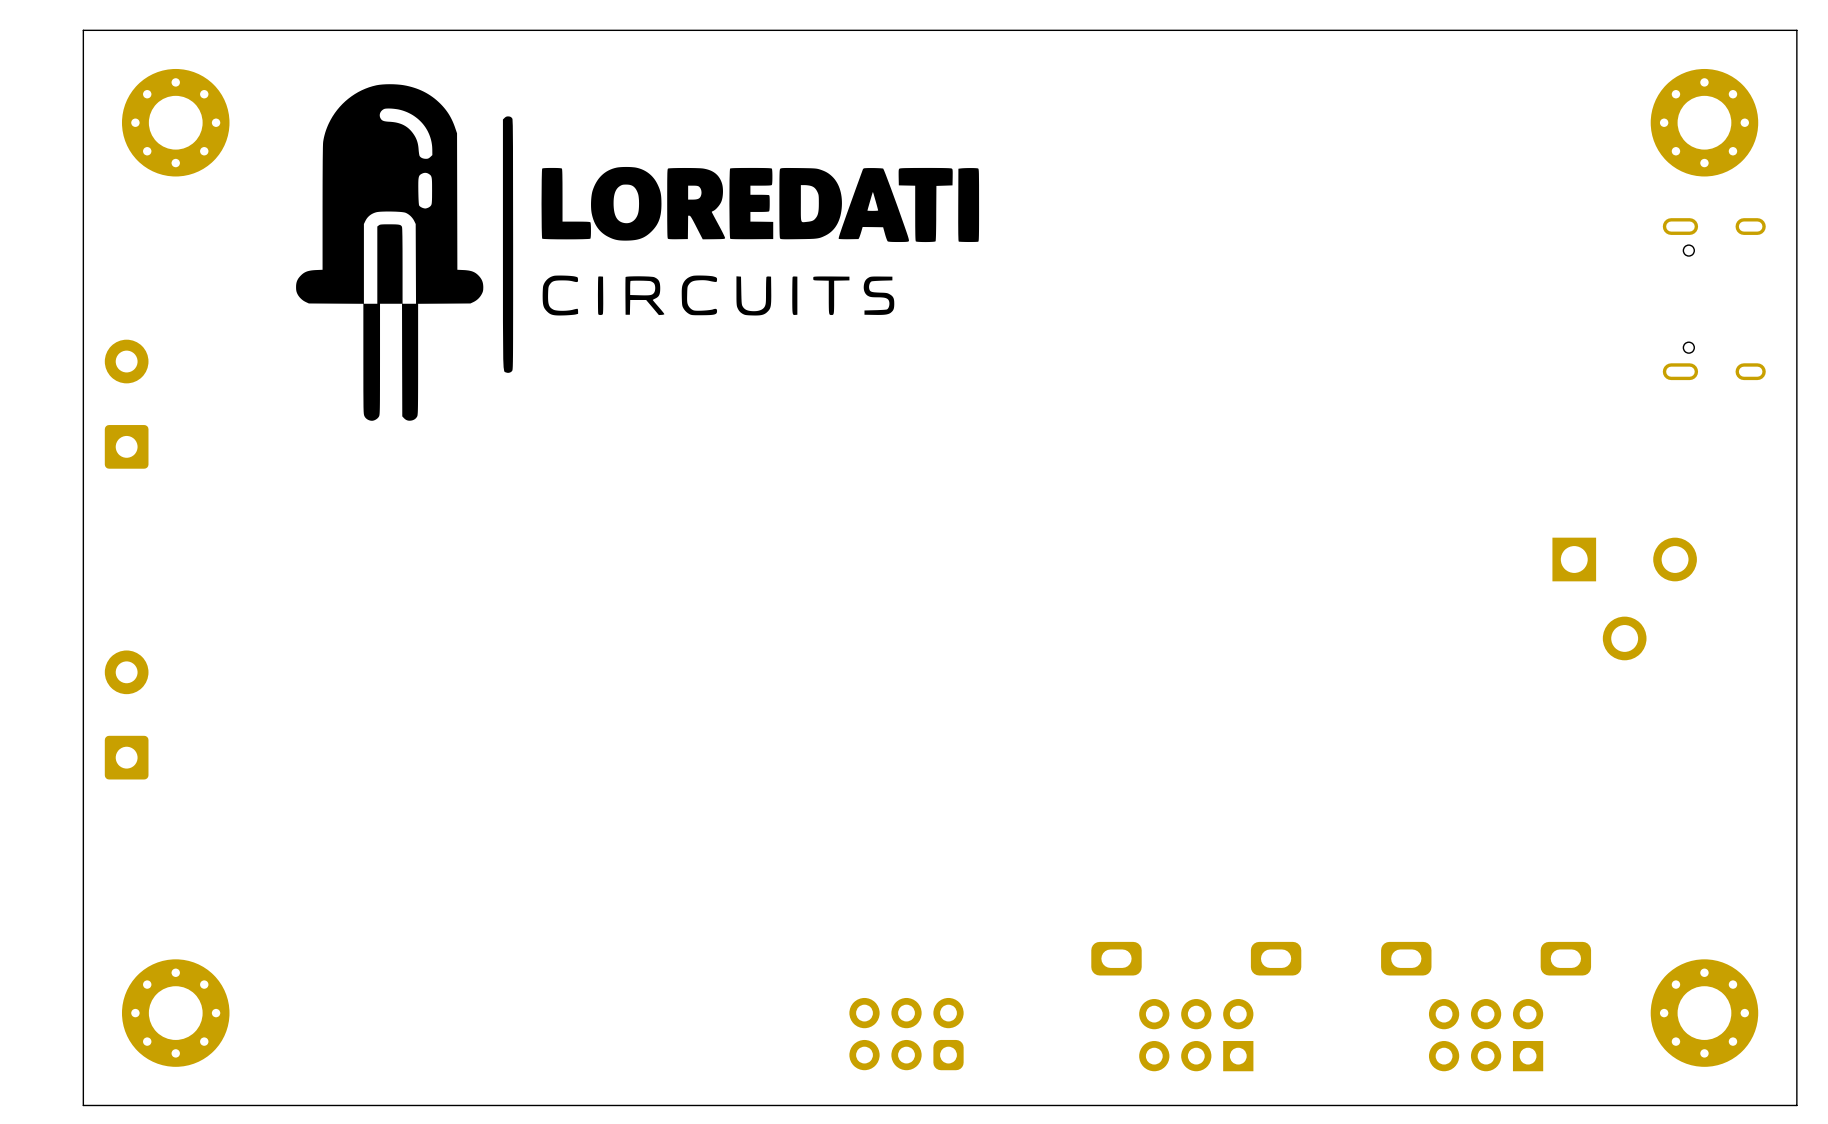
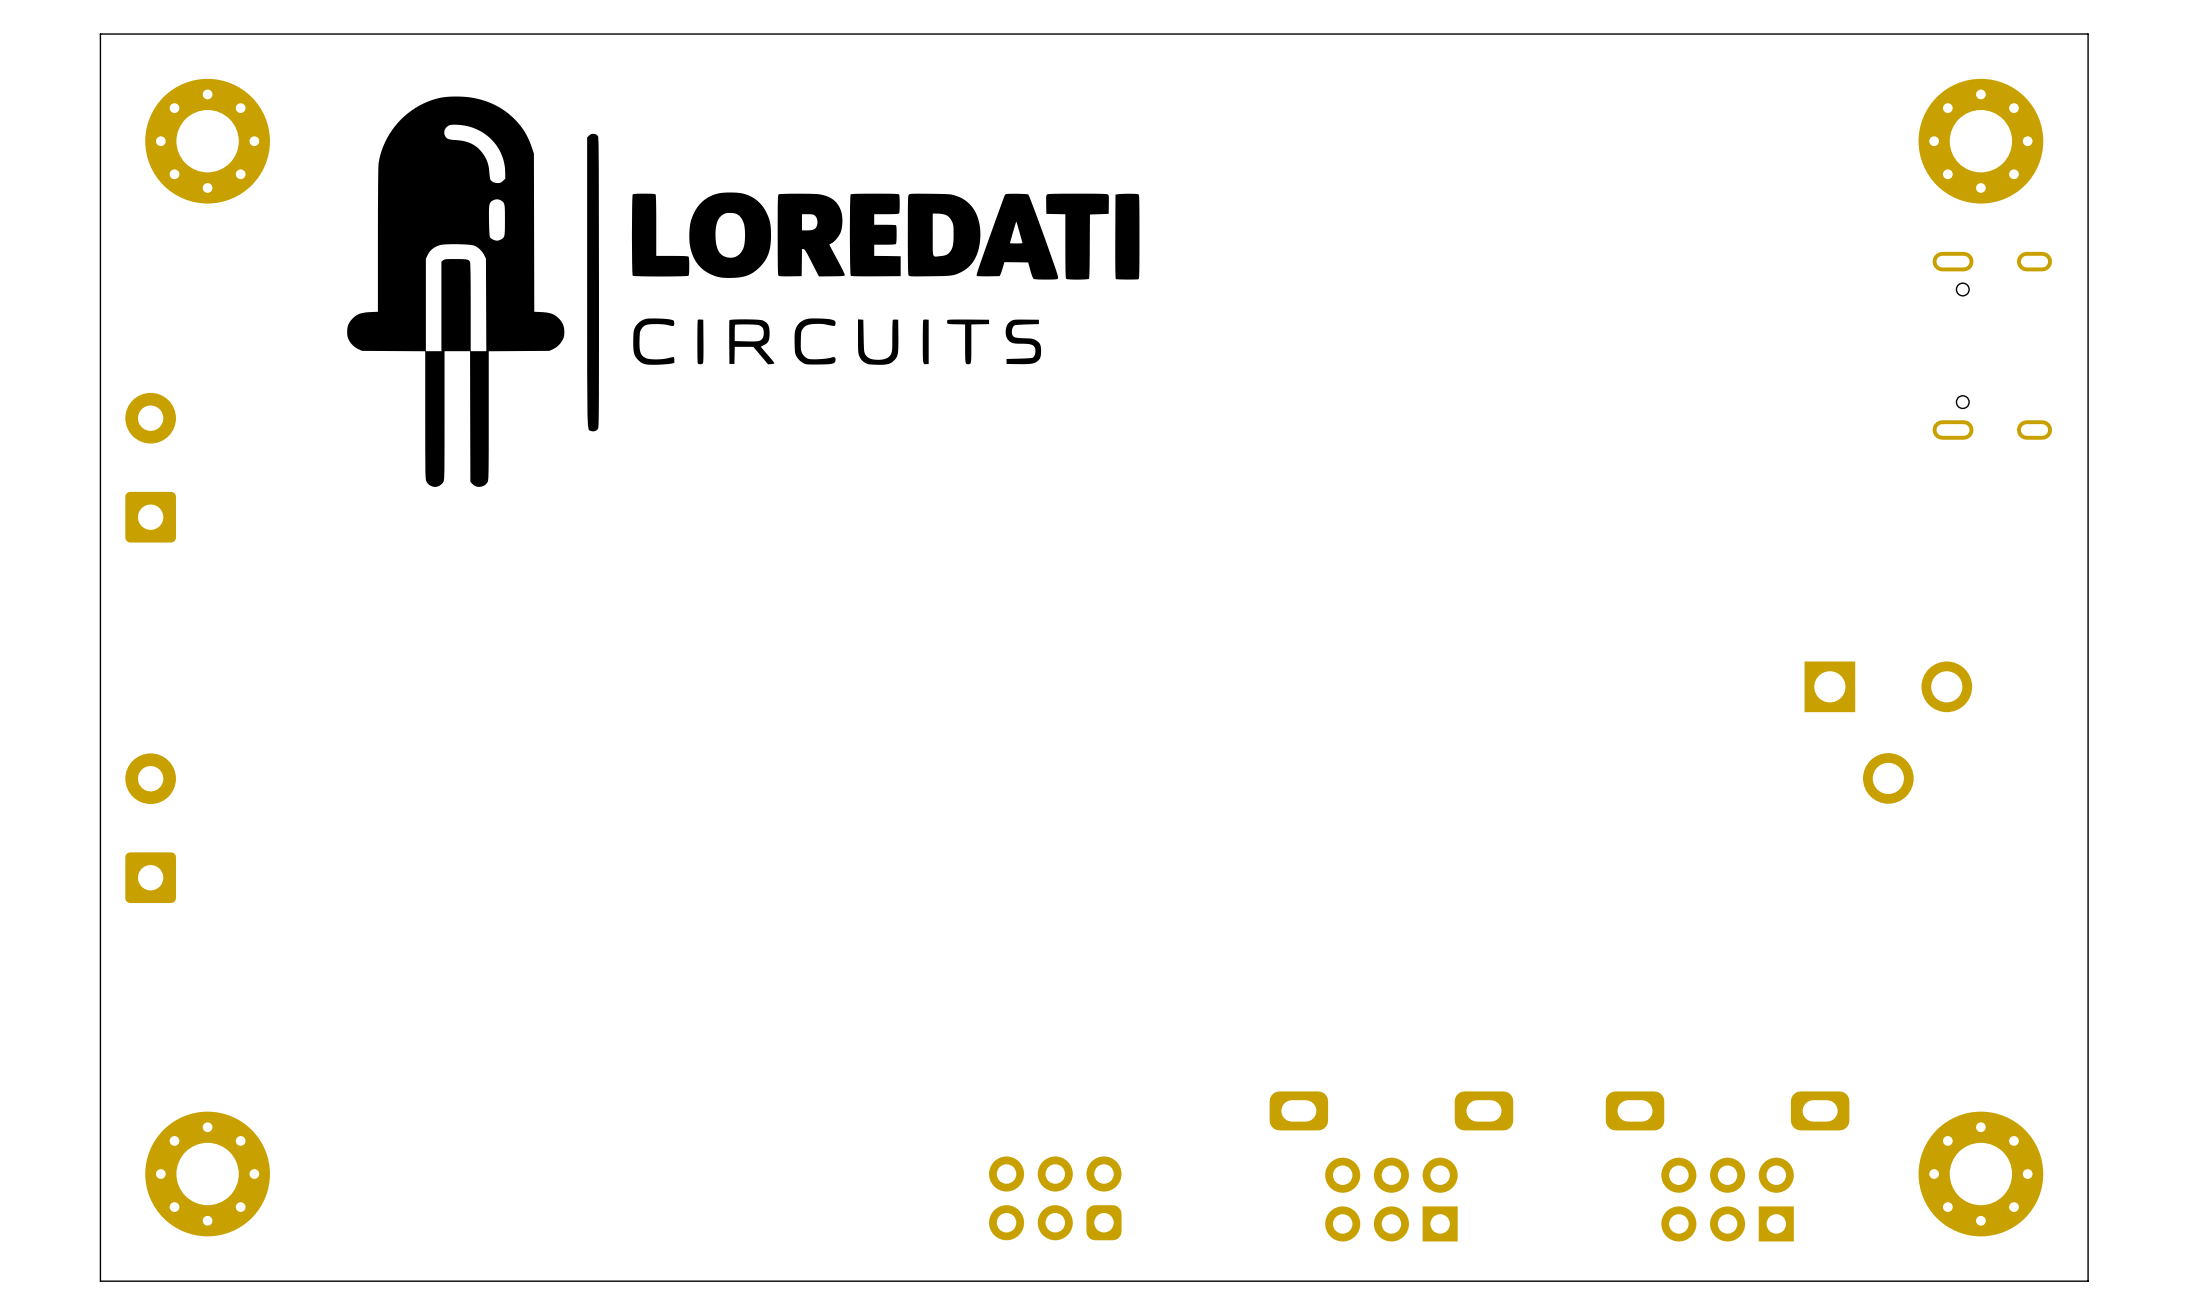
part position: (1624, 598) -> (1888, 732)

